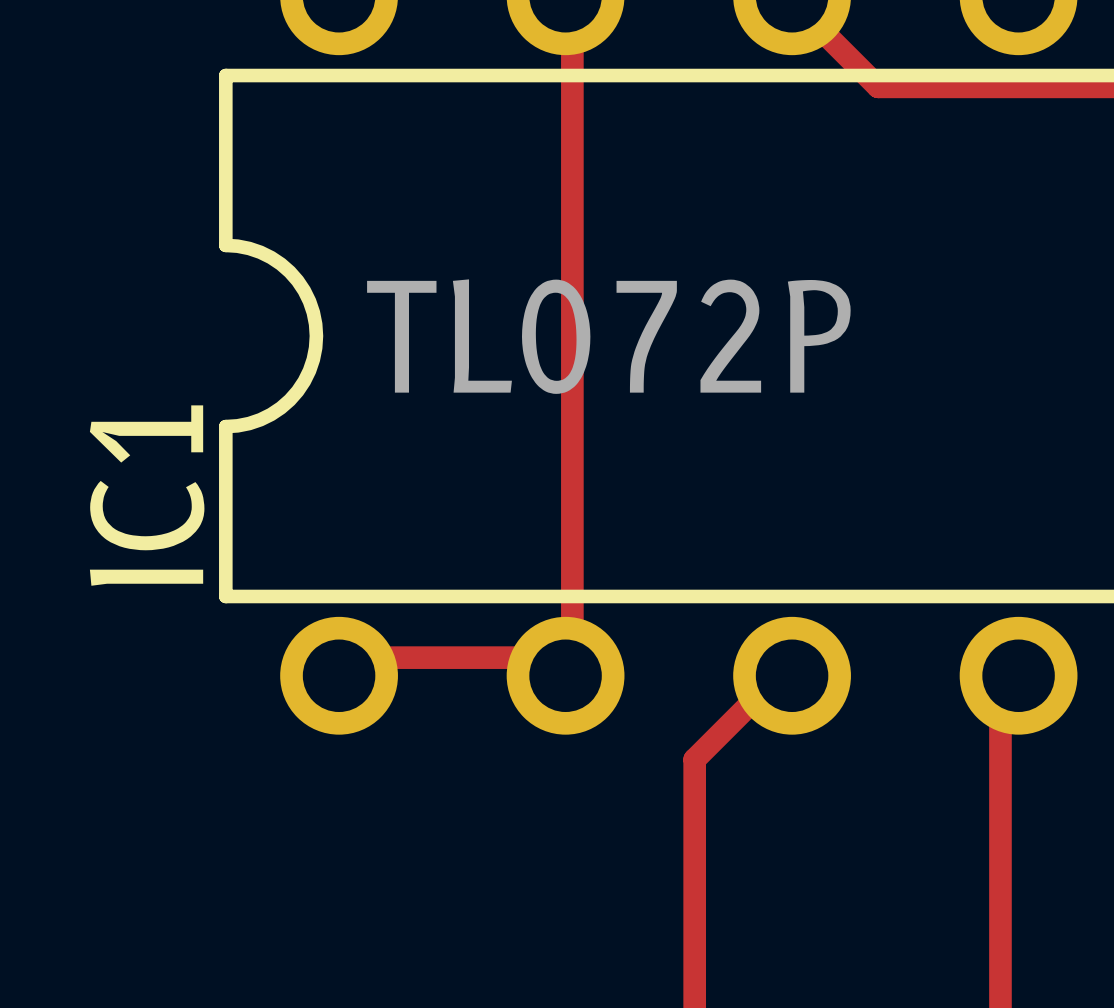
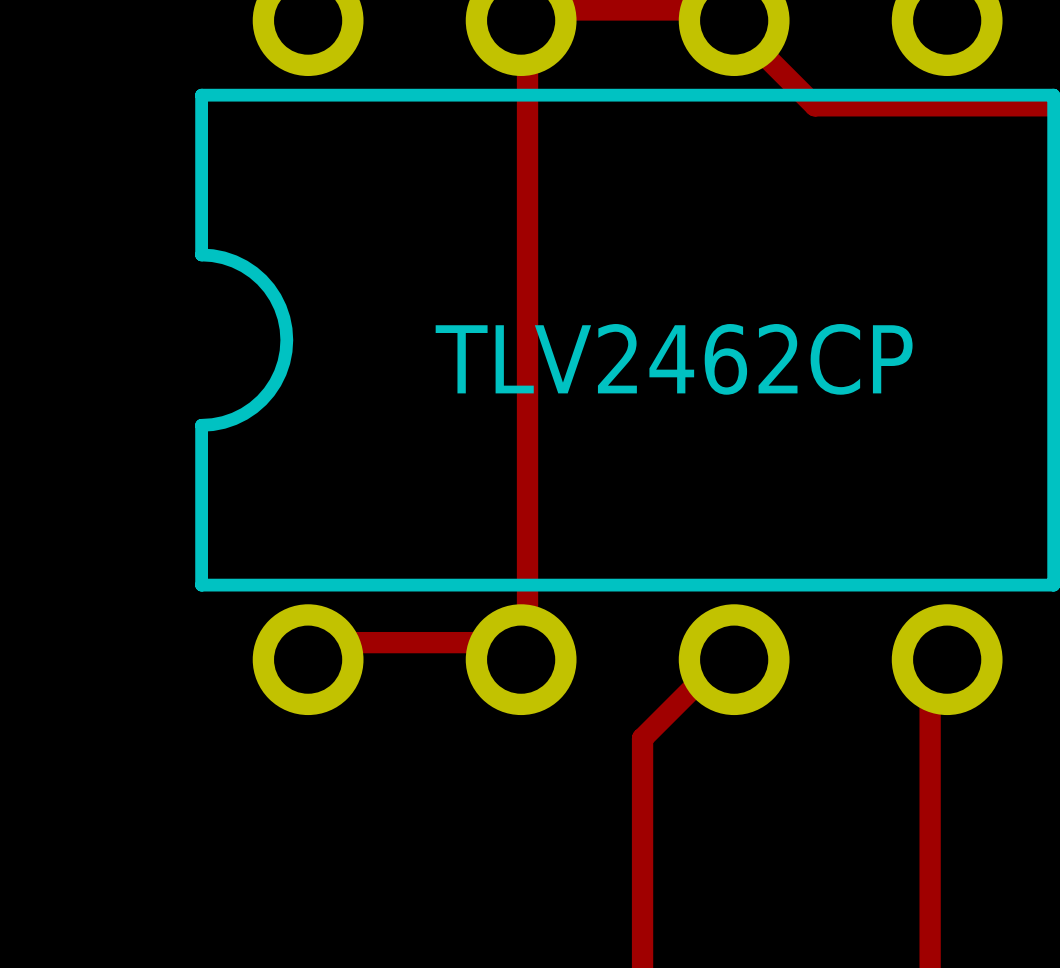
IC1 value: TL072P (608, 336) -> TLV2462CP (674, 359)
IC1 name: IC1 (147, 495) -> none

